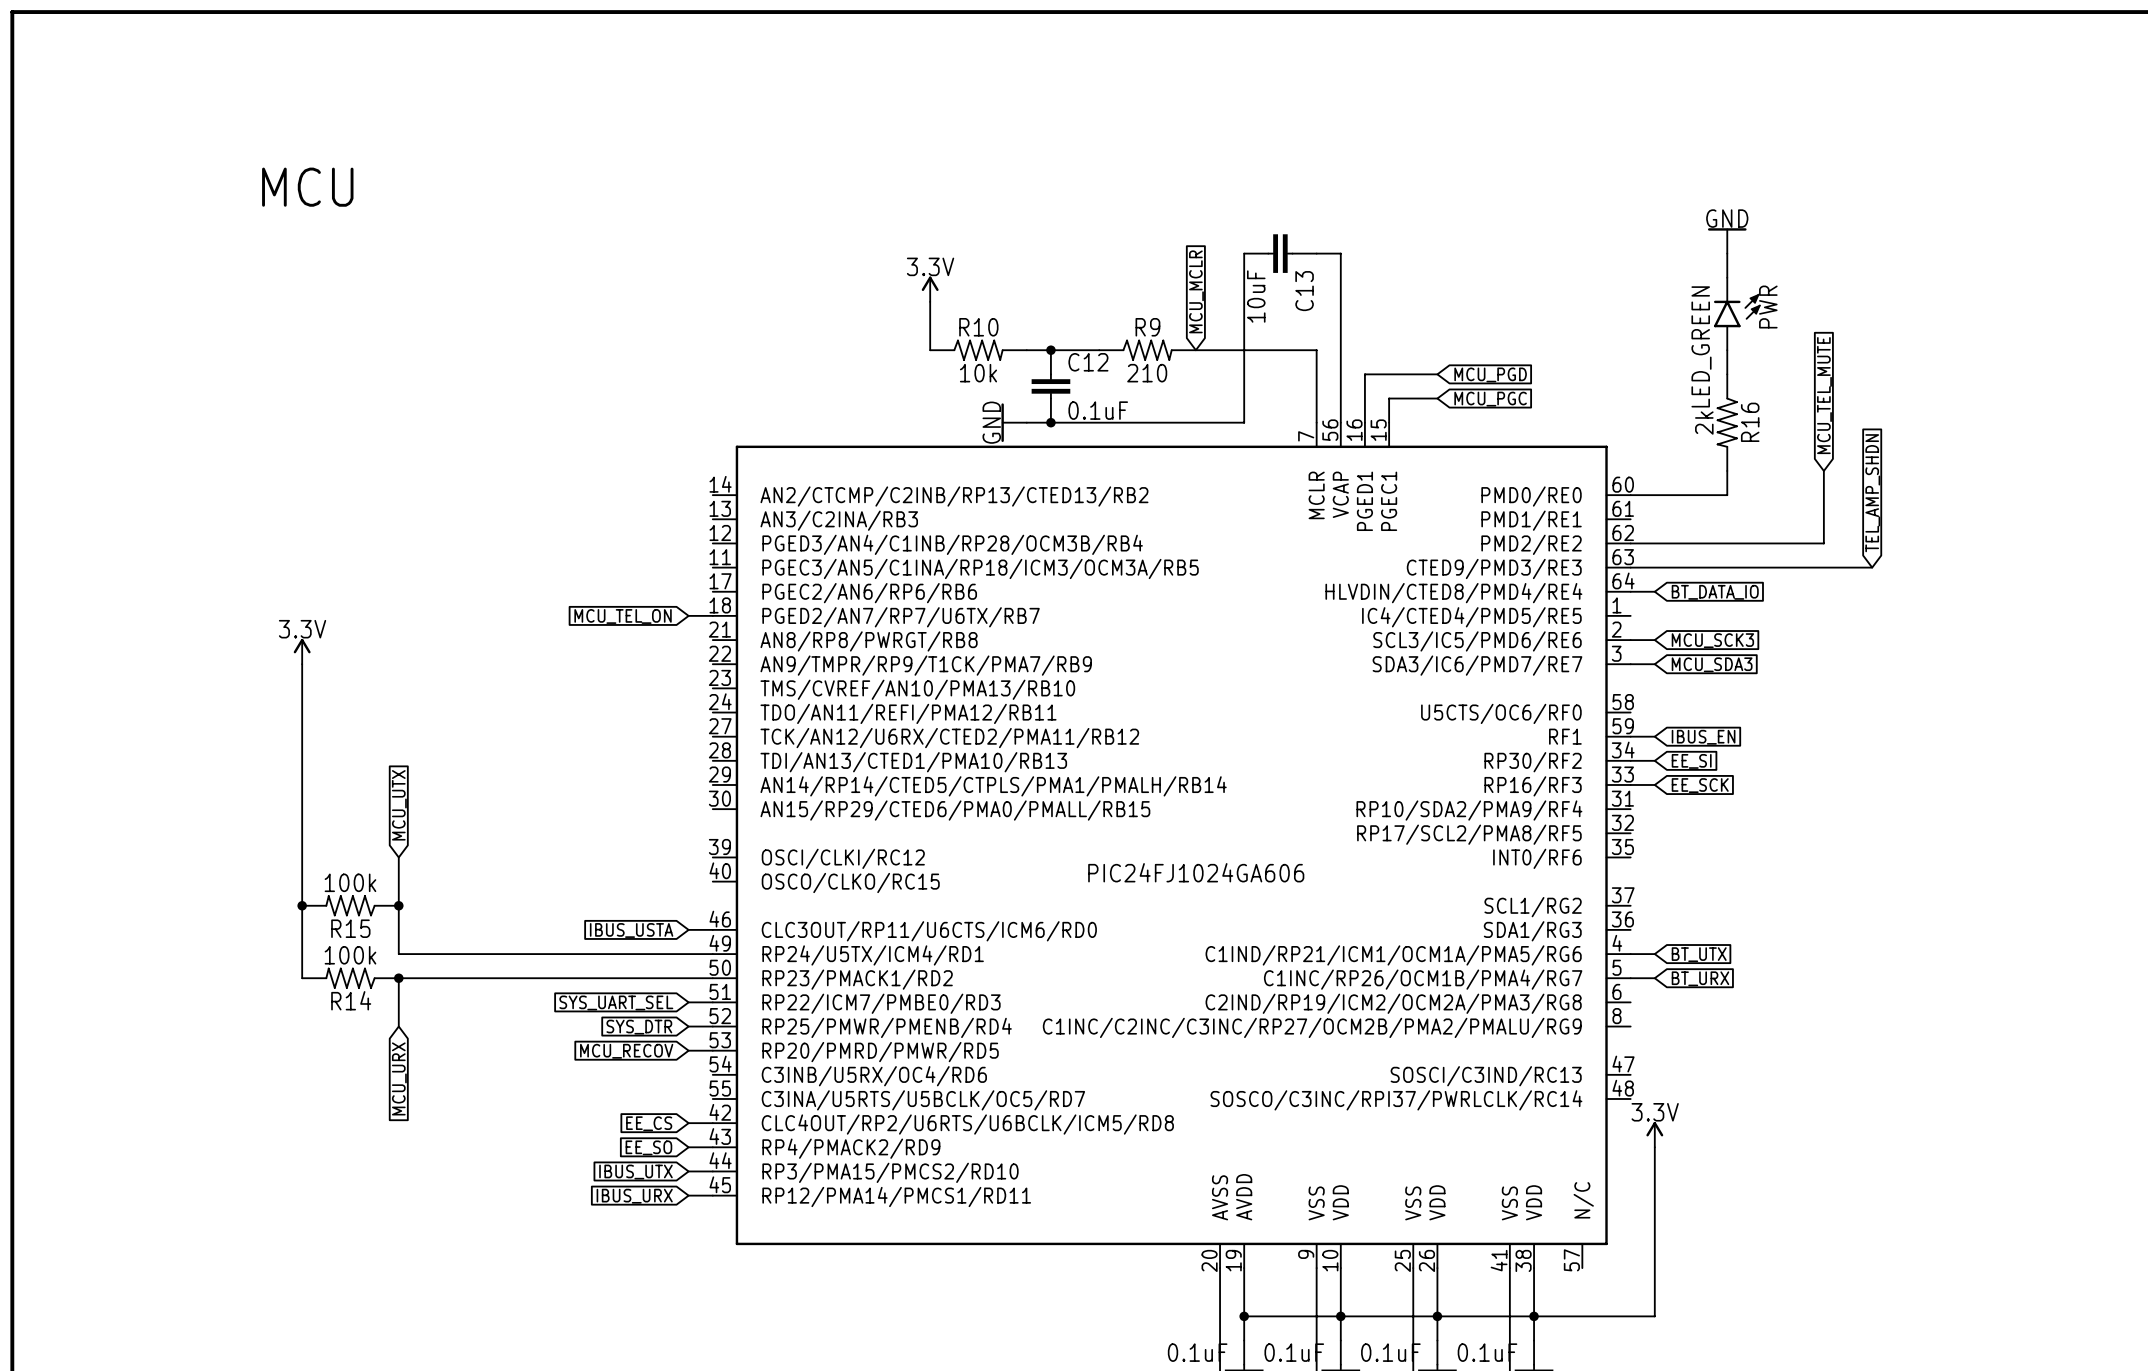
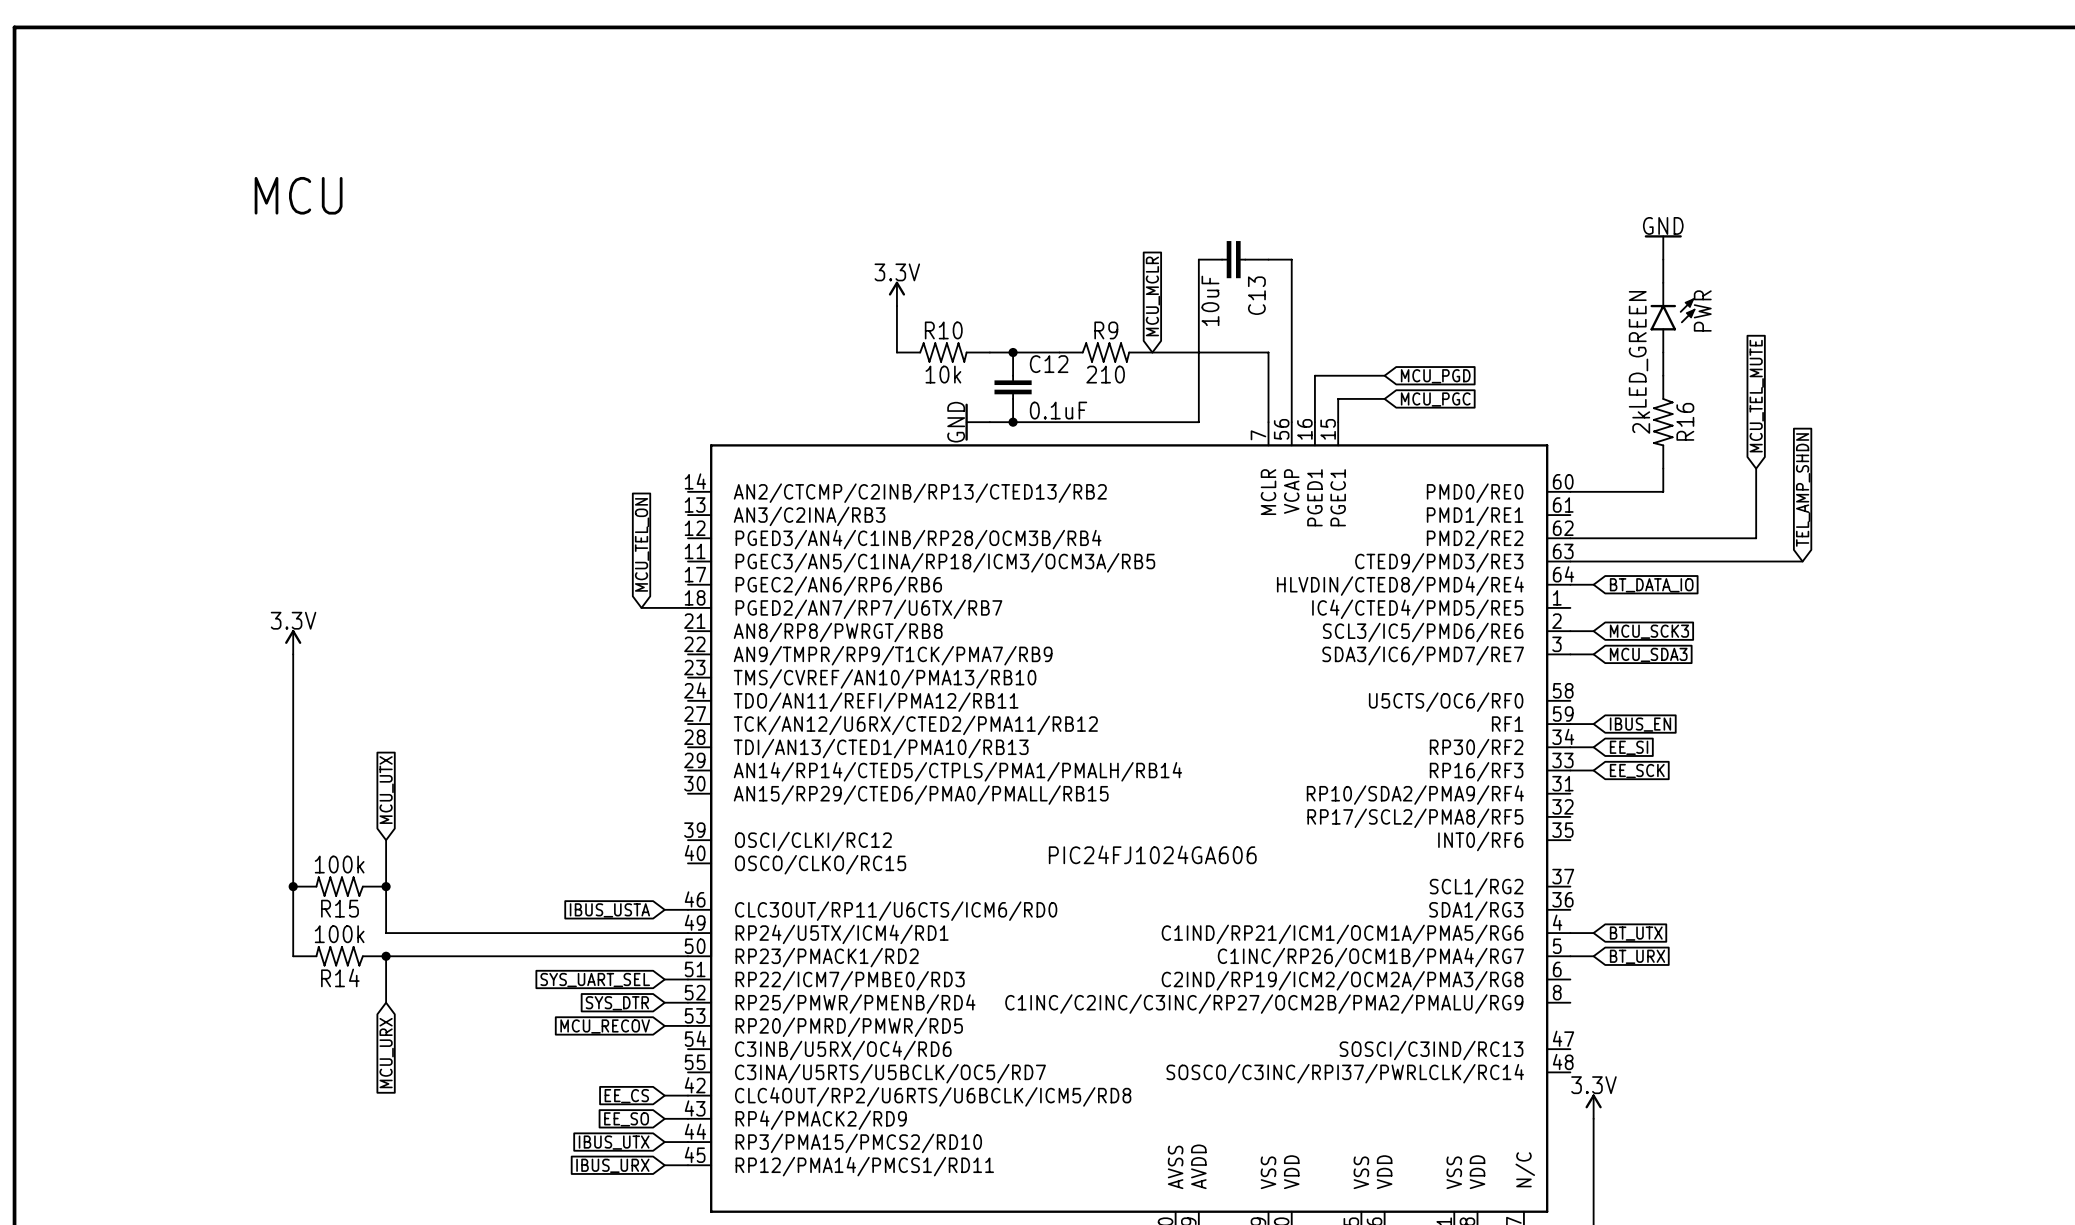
wire: none -> (641, 607) (664, 607)
global label rotation: 0° (623, 616) -> 90° clockwise (642, 544)

